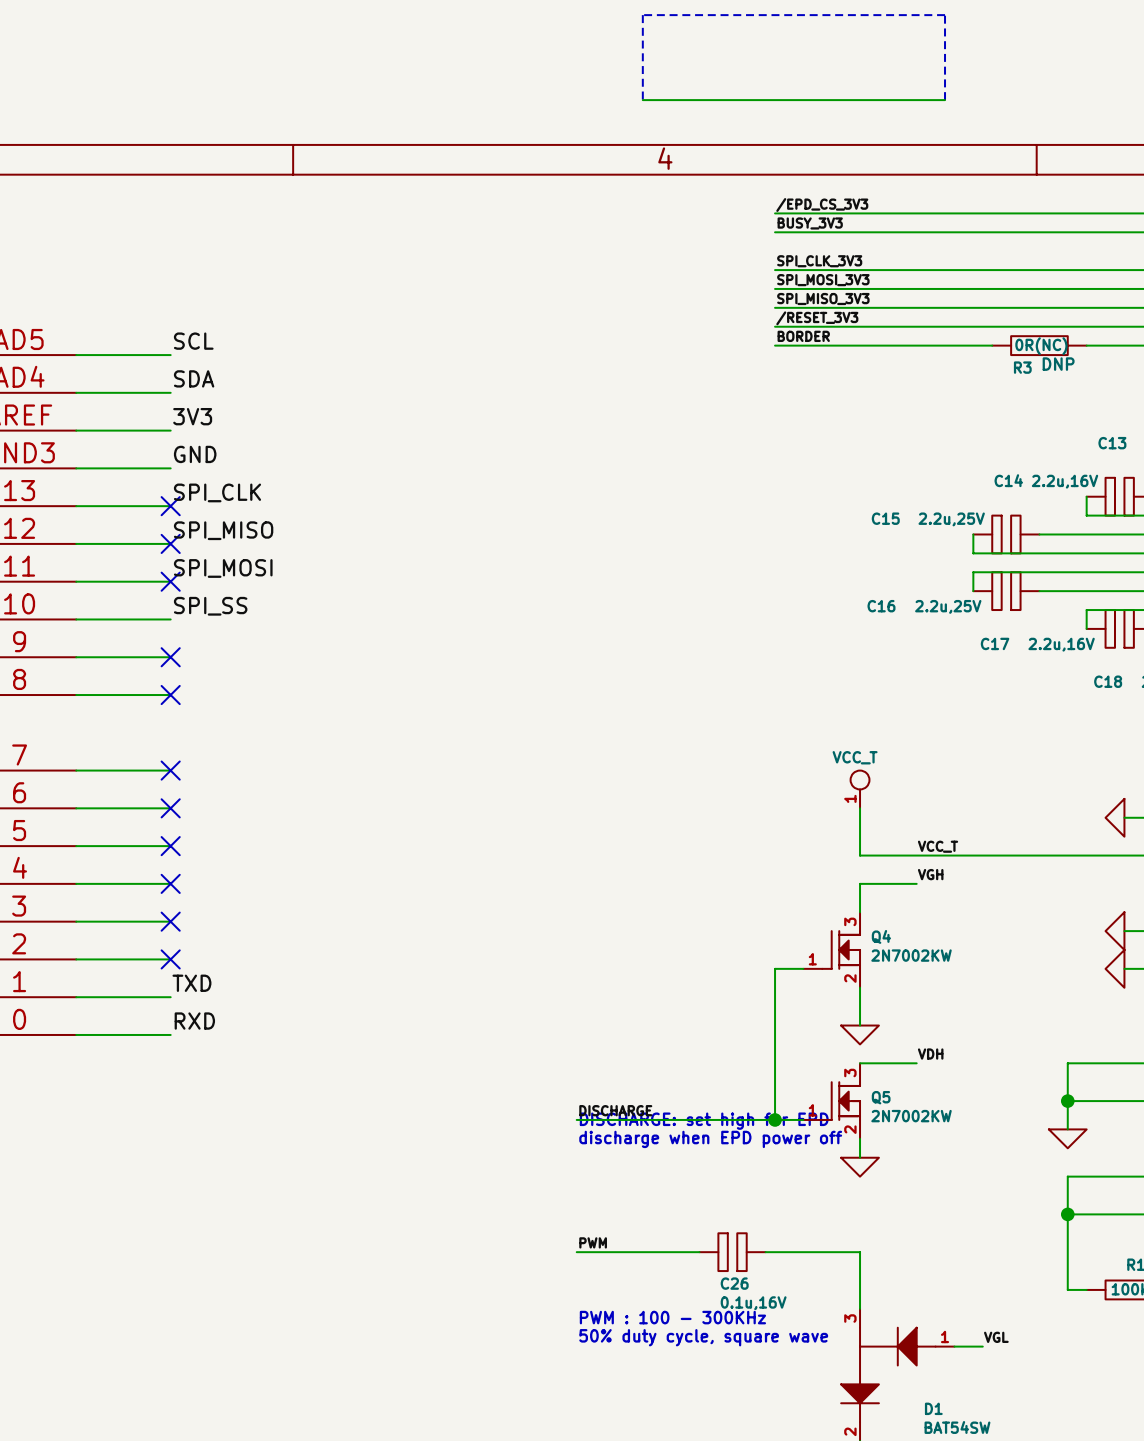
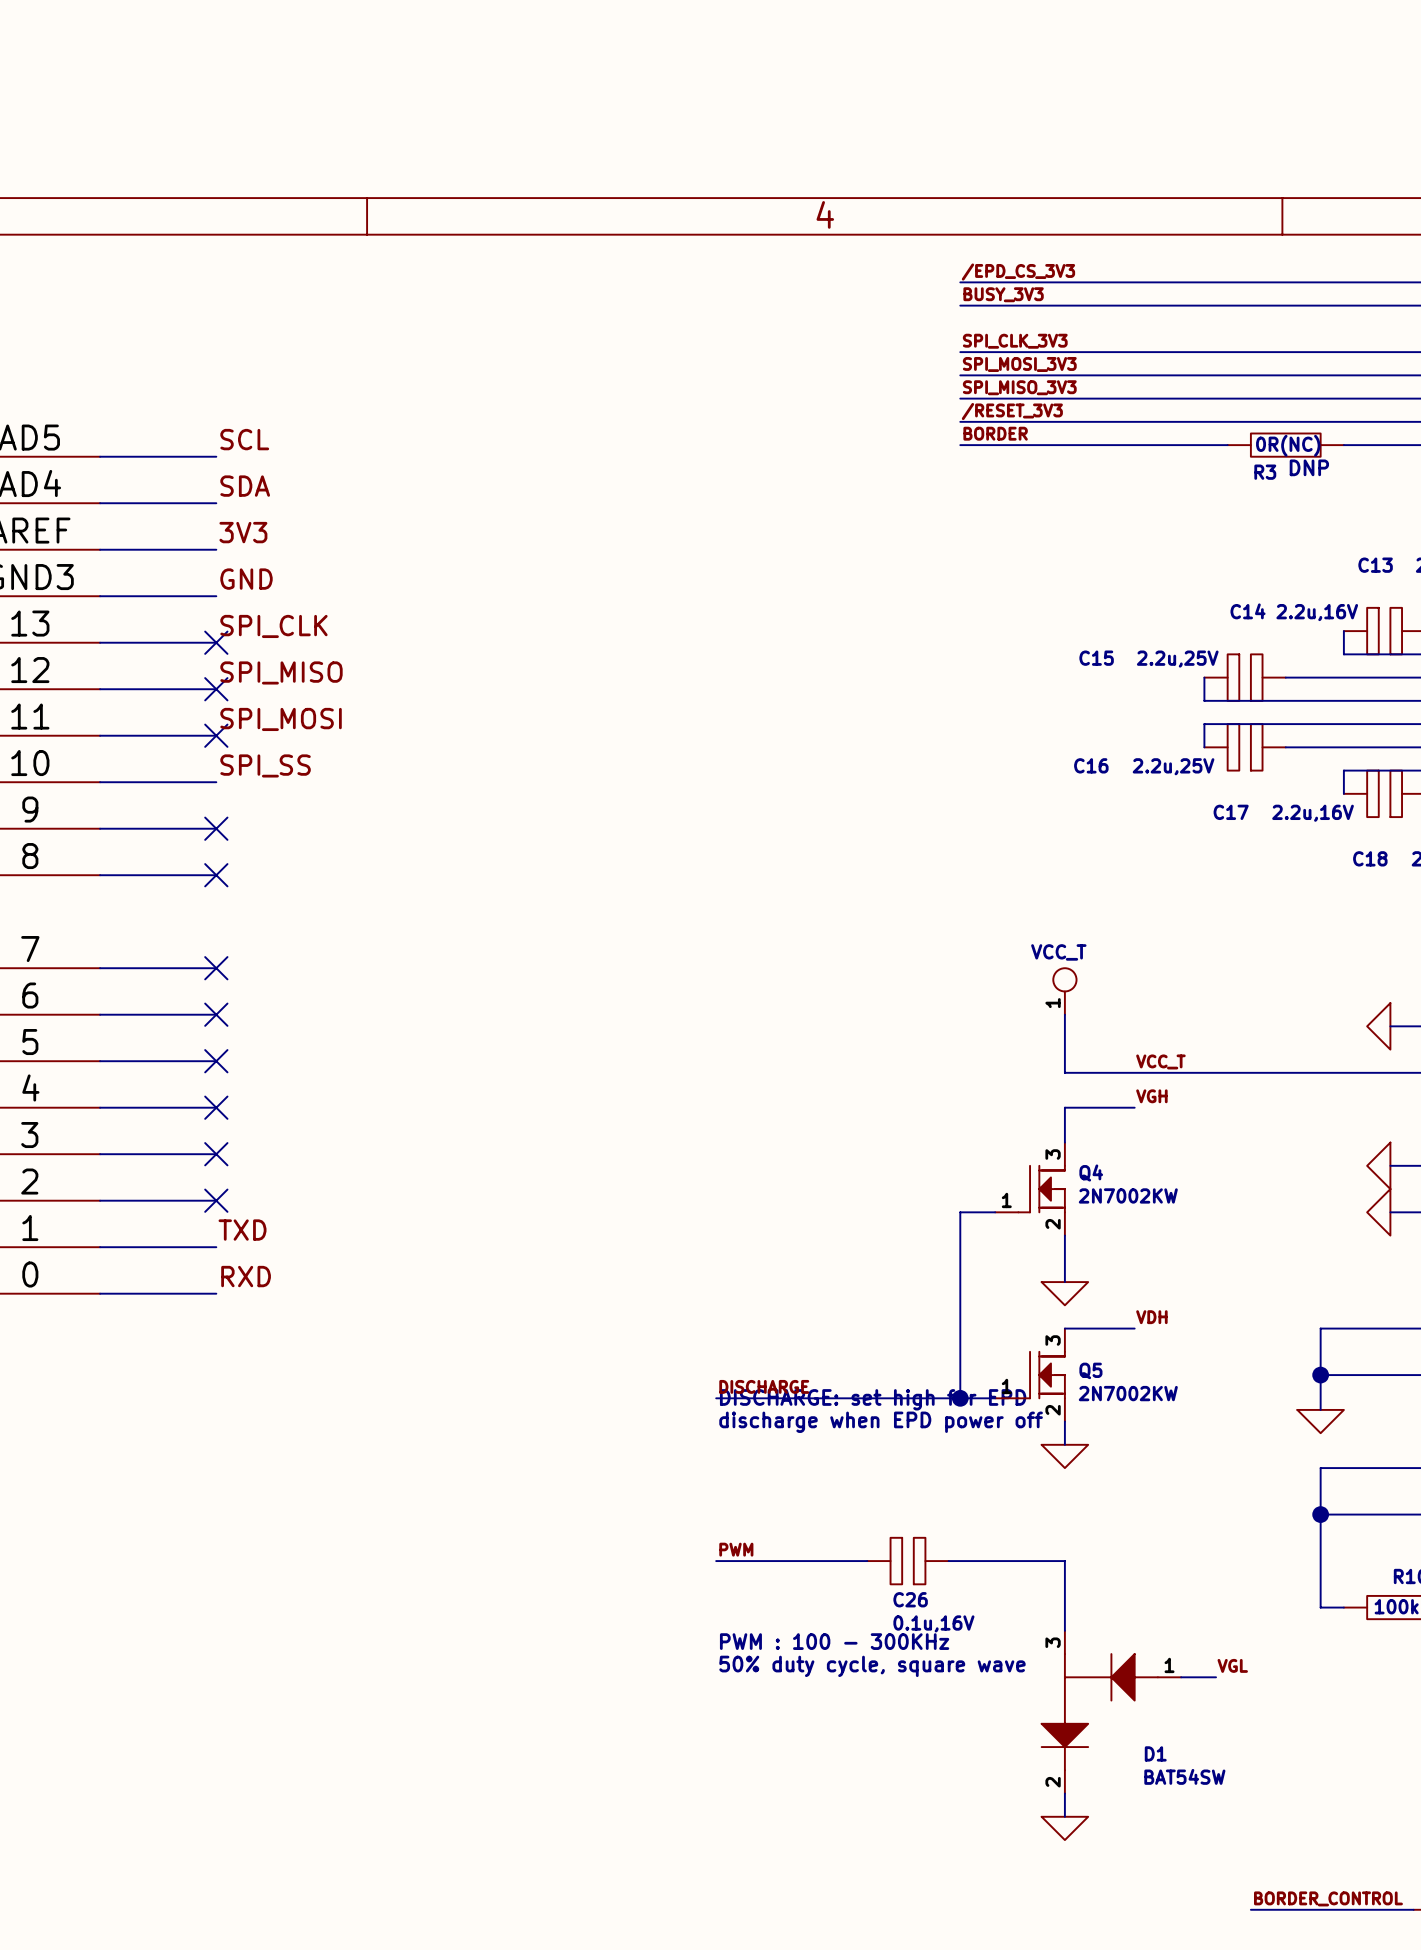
wire: (642, 100) (945, 100) -> none
line: (642, 100) (642, 15) (945, 15) (945, 100) -> none

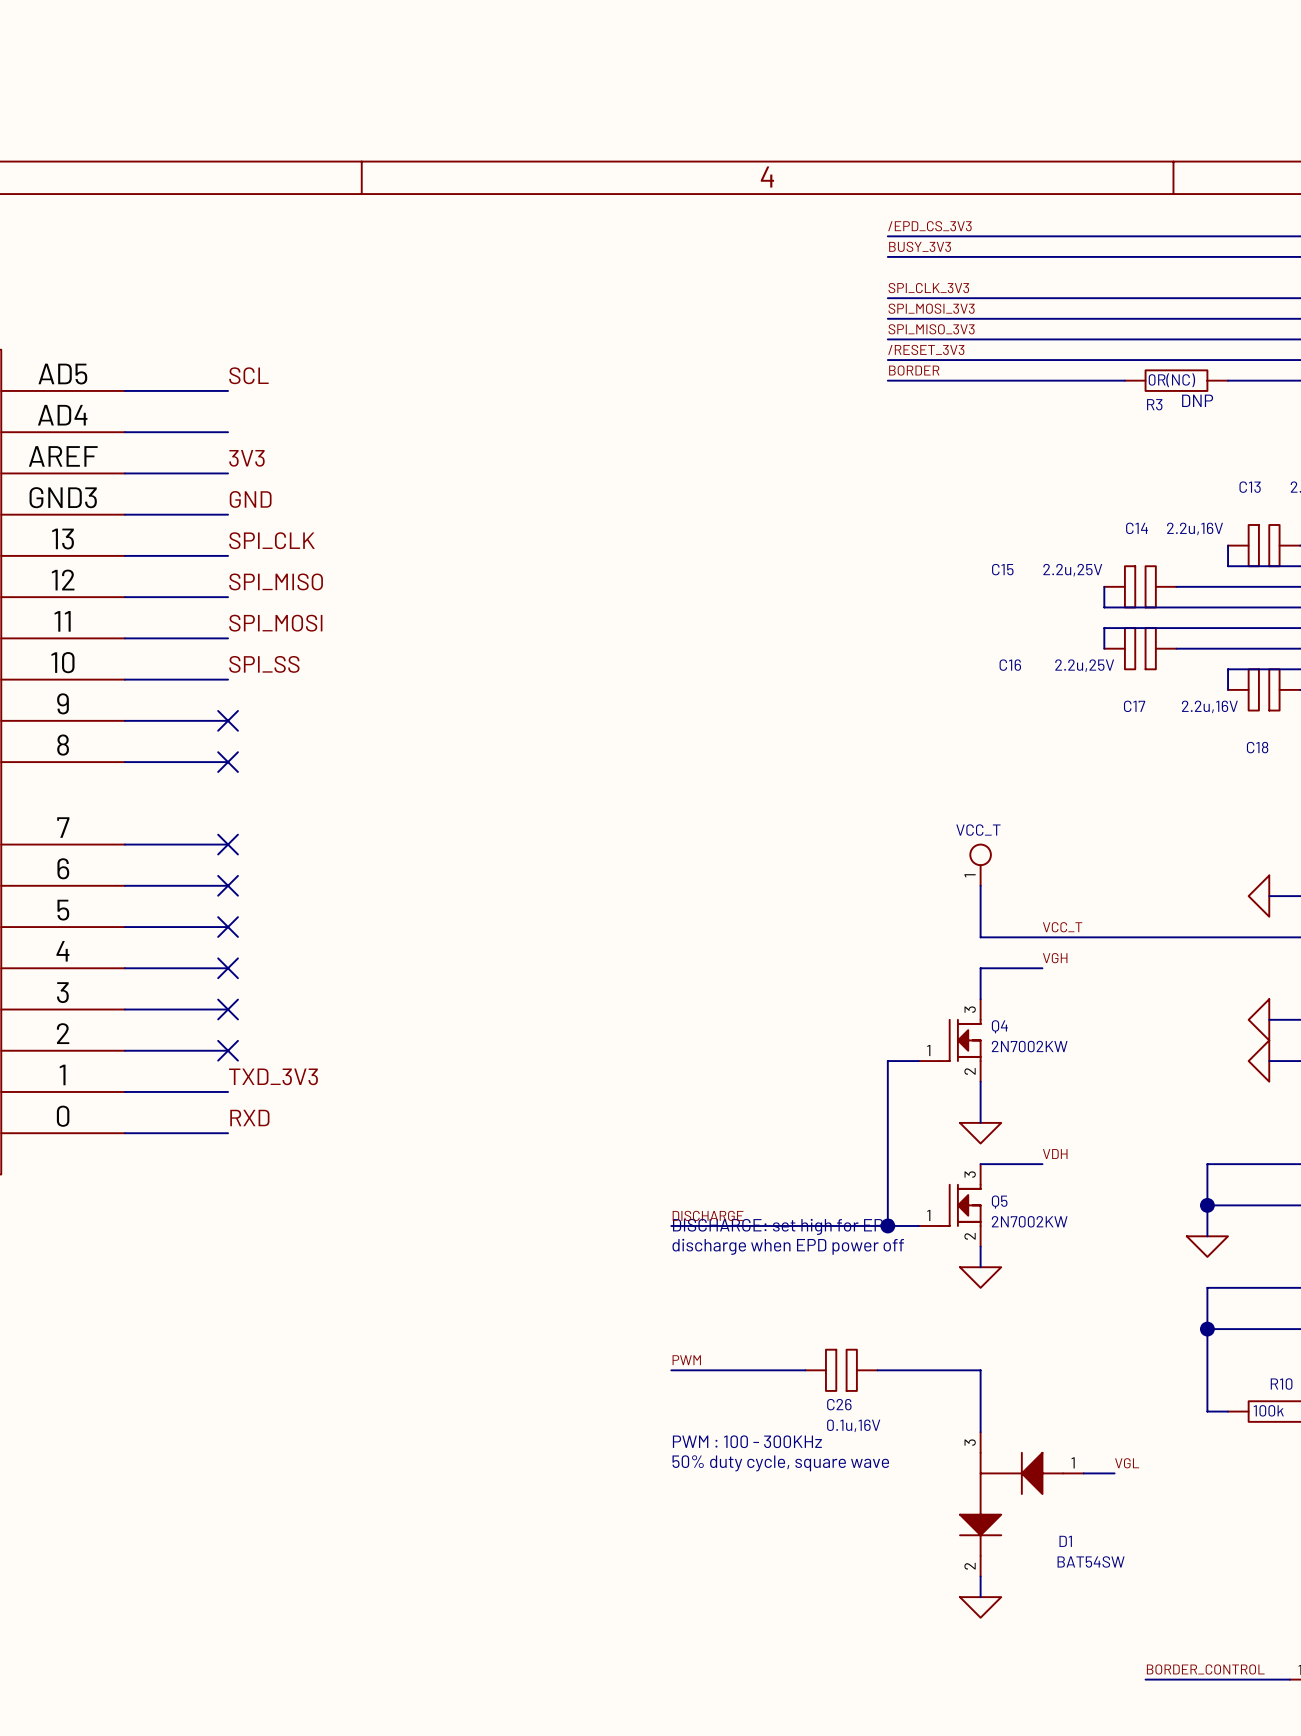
label: SDA (245, 486) -> none
no-connect mark: (216, 642) -> none
no-connect mark: (216, 689) -> none
no-connect mark: (216, 735) -> none
label: TXD (242, 1230) -> TXD_3V3 (273, 1076)

